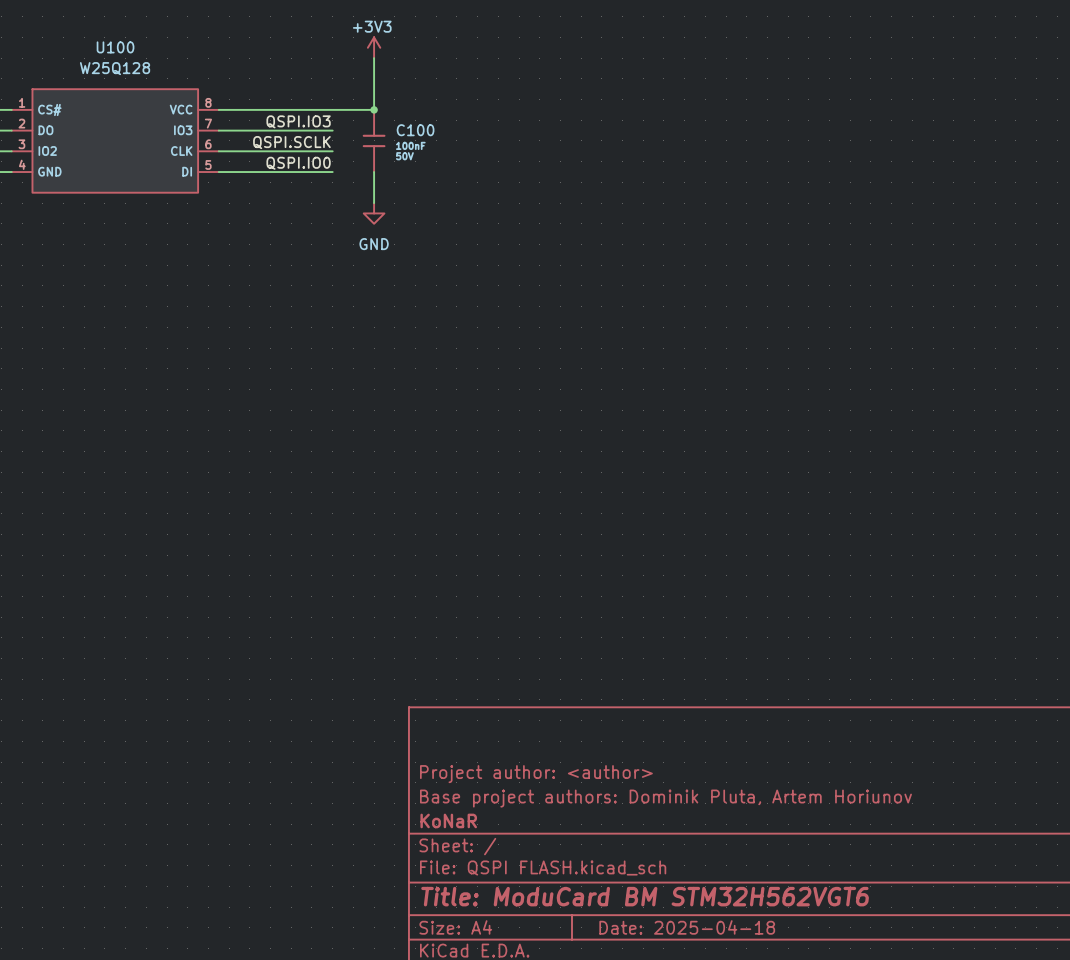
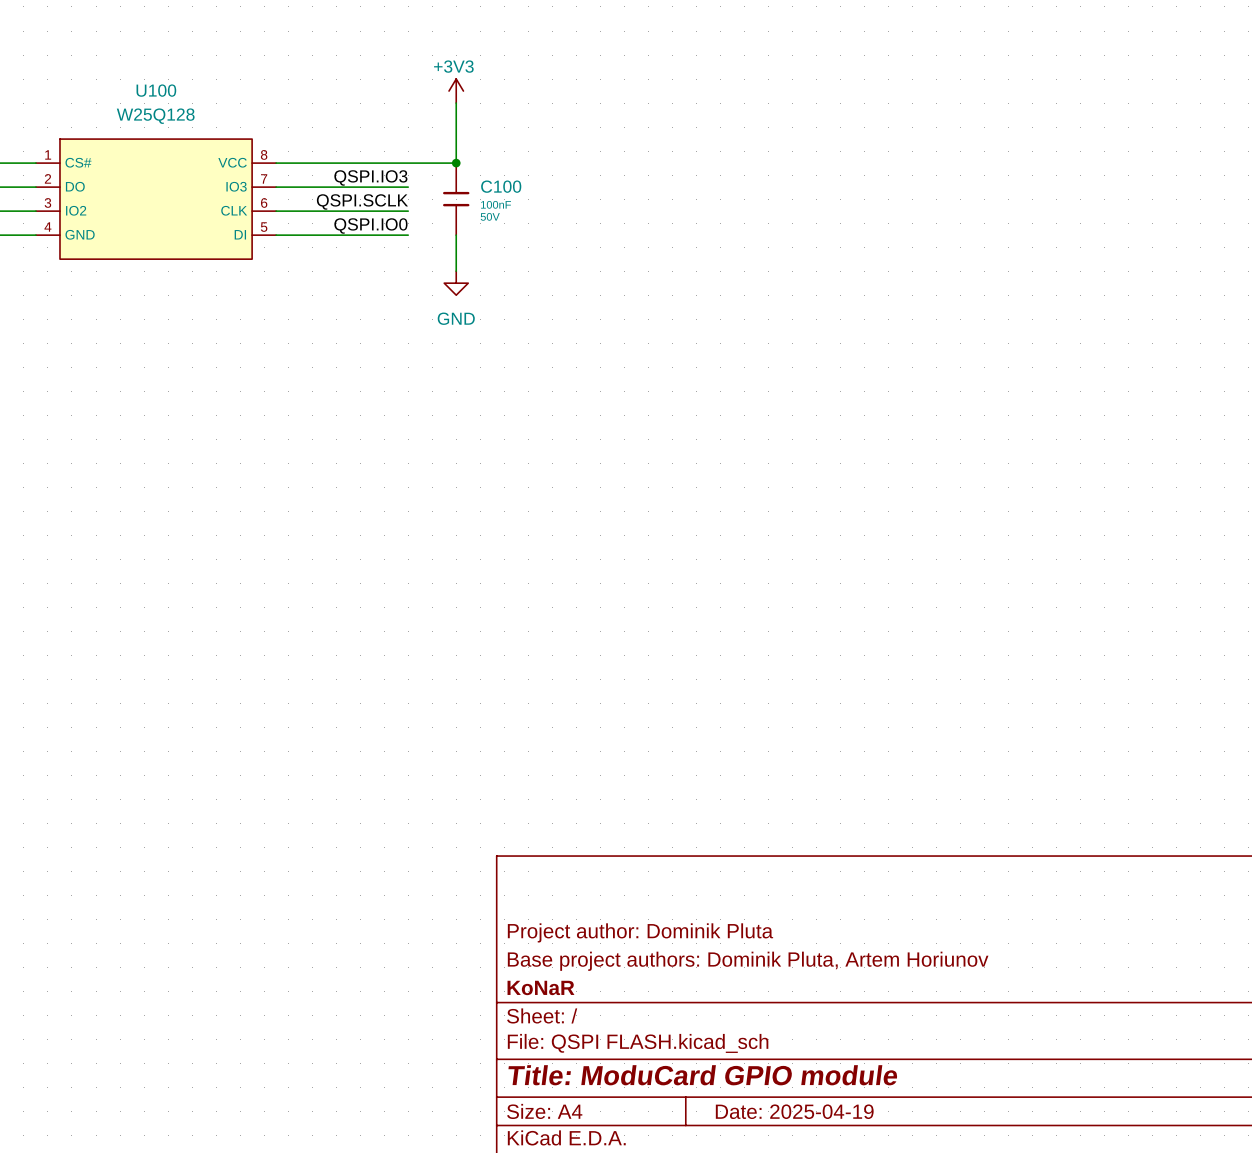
title block: Project author: <author> (536, 774) -> Project author: Dominik Pluta (640, 932)
title block: Title: ModuCard BM STM32H562VGT6 (645, 896) -> Title: ModuCard GPIO module (702, 1075)
title block: Date: 2025-04-18 (687, 927) -> Date: 2025-04-19 (794, 1111)

